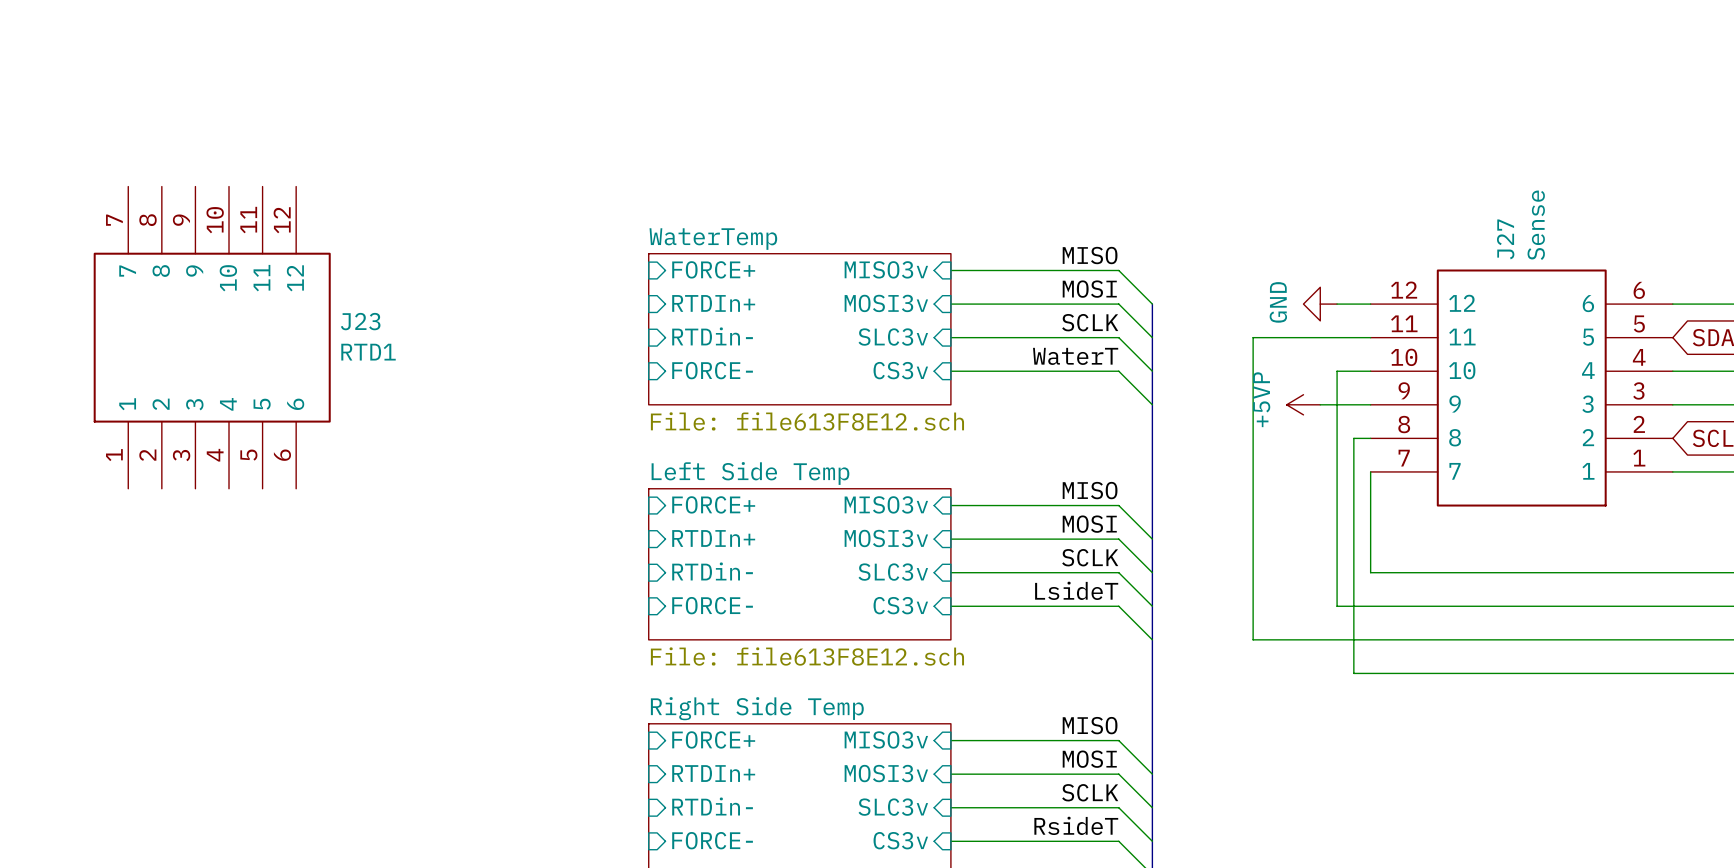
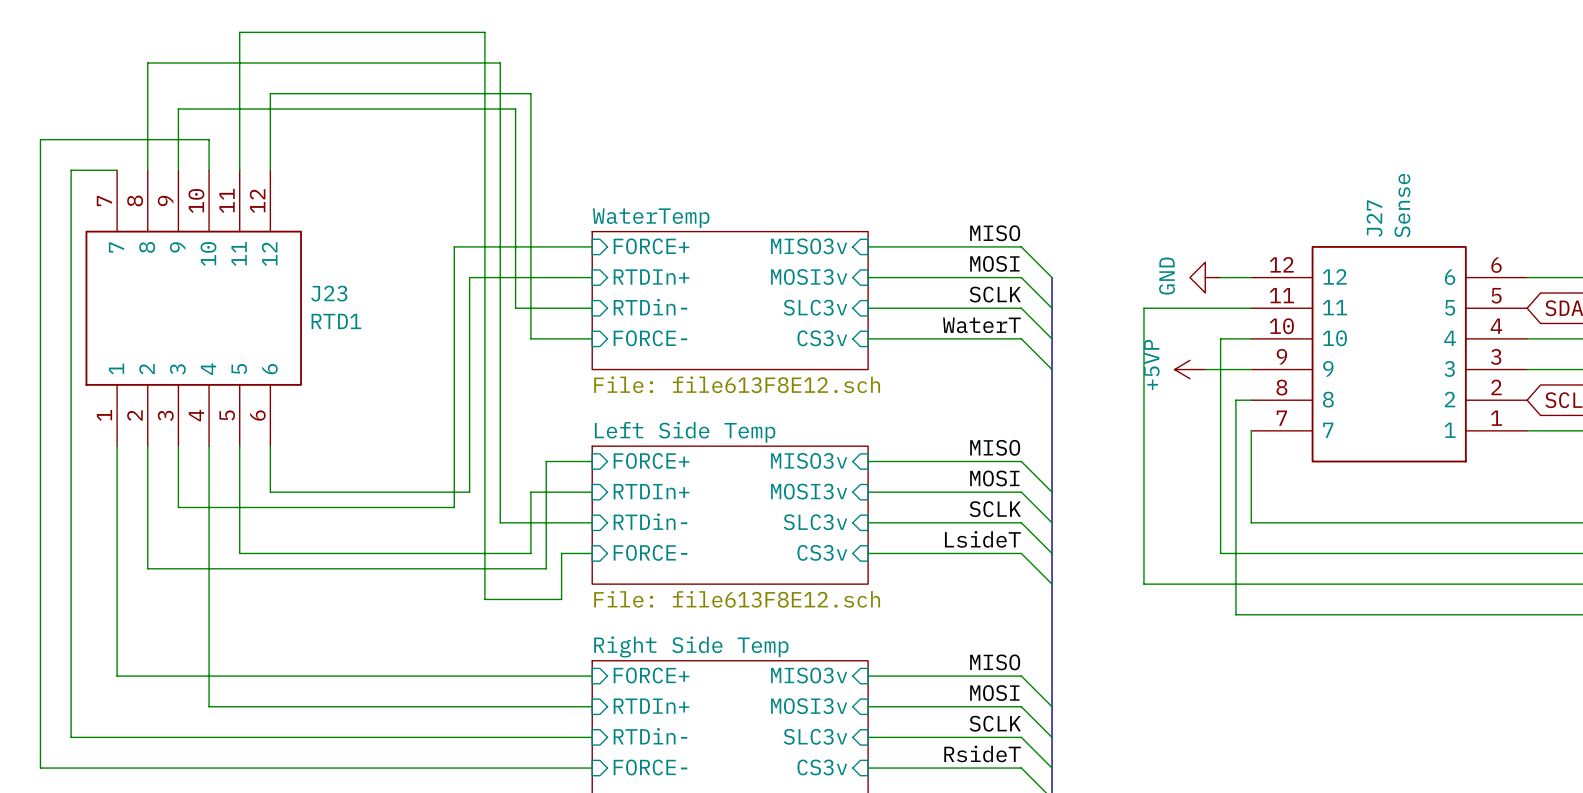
wire: none -> (117, 170) (71, 170) (71, 737) (592, 737)
wire: none -> (147, 170) (147, 63) (500, 63) (500, 522) (592, 522)
wire: none -> (178, 170) (178, 109) (515, 109) (515, 308) (592, 308)
wire: none -> (209, 170) (209, 139) (40, 139) (40, 768) (592, 768)
wire: none -> (239, 170) (239, 32) (484, 32) (484, 599) (561, 599) (561, 553) (592, 553)
wire: none -> (270, 170) (270, 93) (530, 93) (530, 338) (592, 338)
wire: none -> (592, 246) (454, 246) (454, 507) (178, 507) (178, 446)
wire: none -> (592, 277) (469, 277) (469, 492) (270, 492) (270, 446)
wire: none -> (117, 446) (117, 676) (592, 676)
wire: none -> (147, 446) (147, 568) (546, 568) (546, 461) (592, 461)
wire: none -> (209, 446) (209, 706) (592, 706)
wire: none -> (239, 446) (239, 553) (530, 553) (530, 492) (592, 492)

